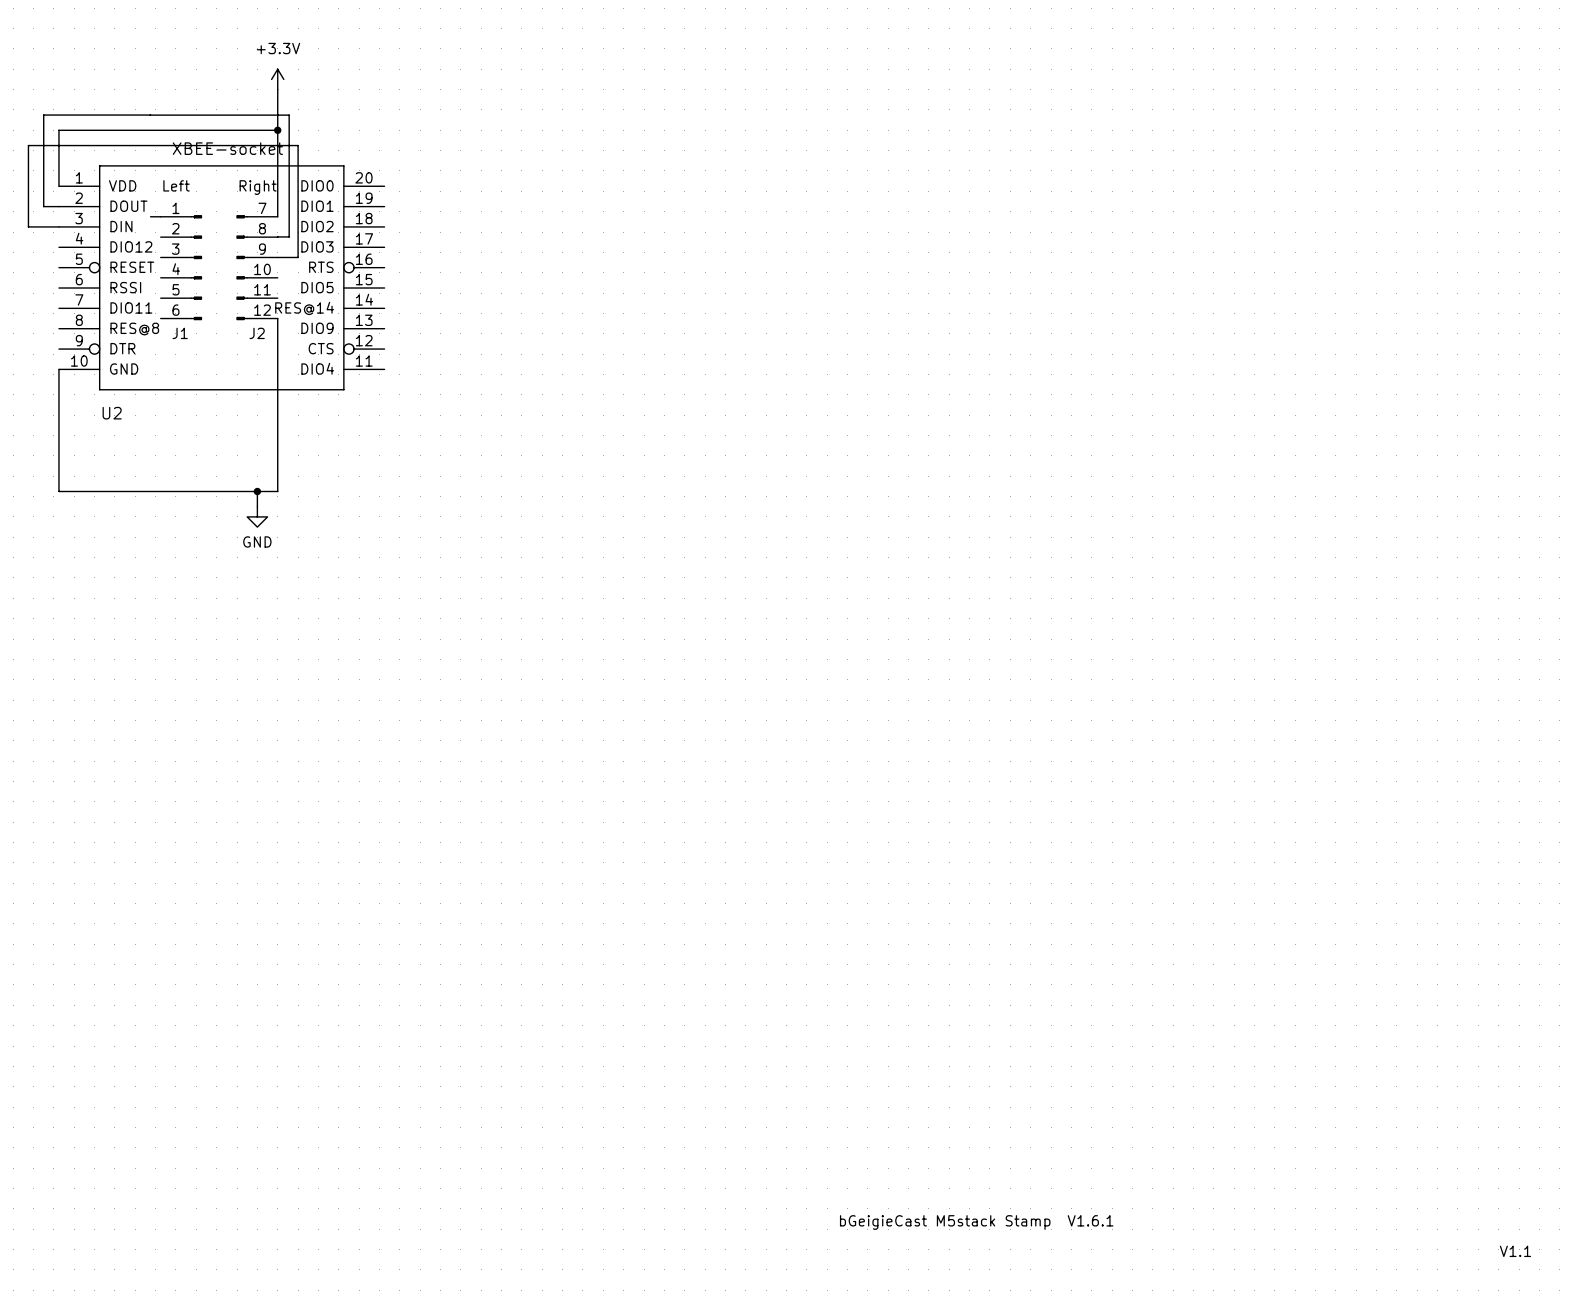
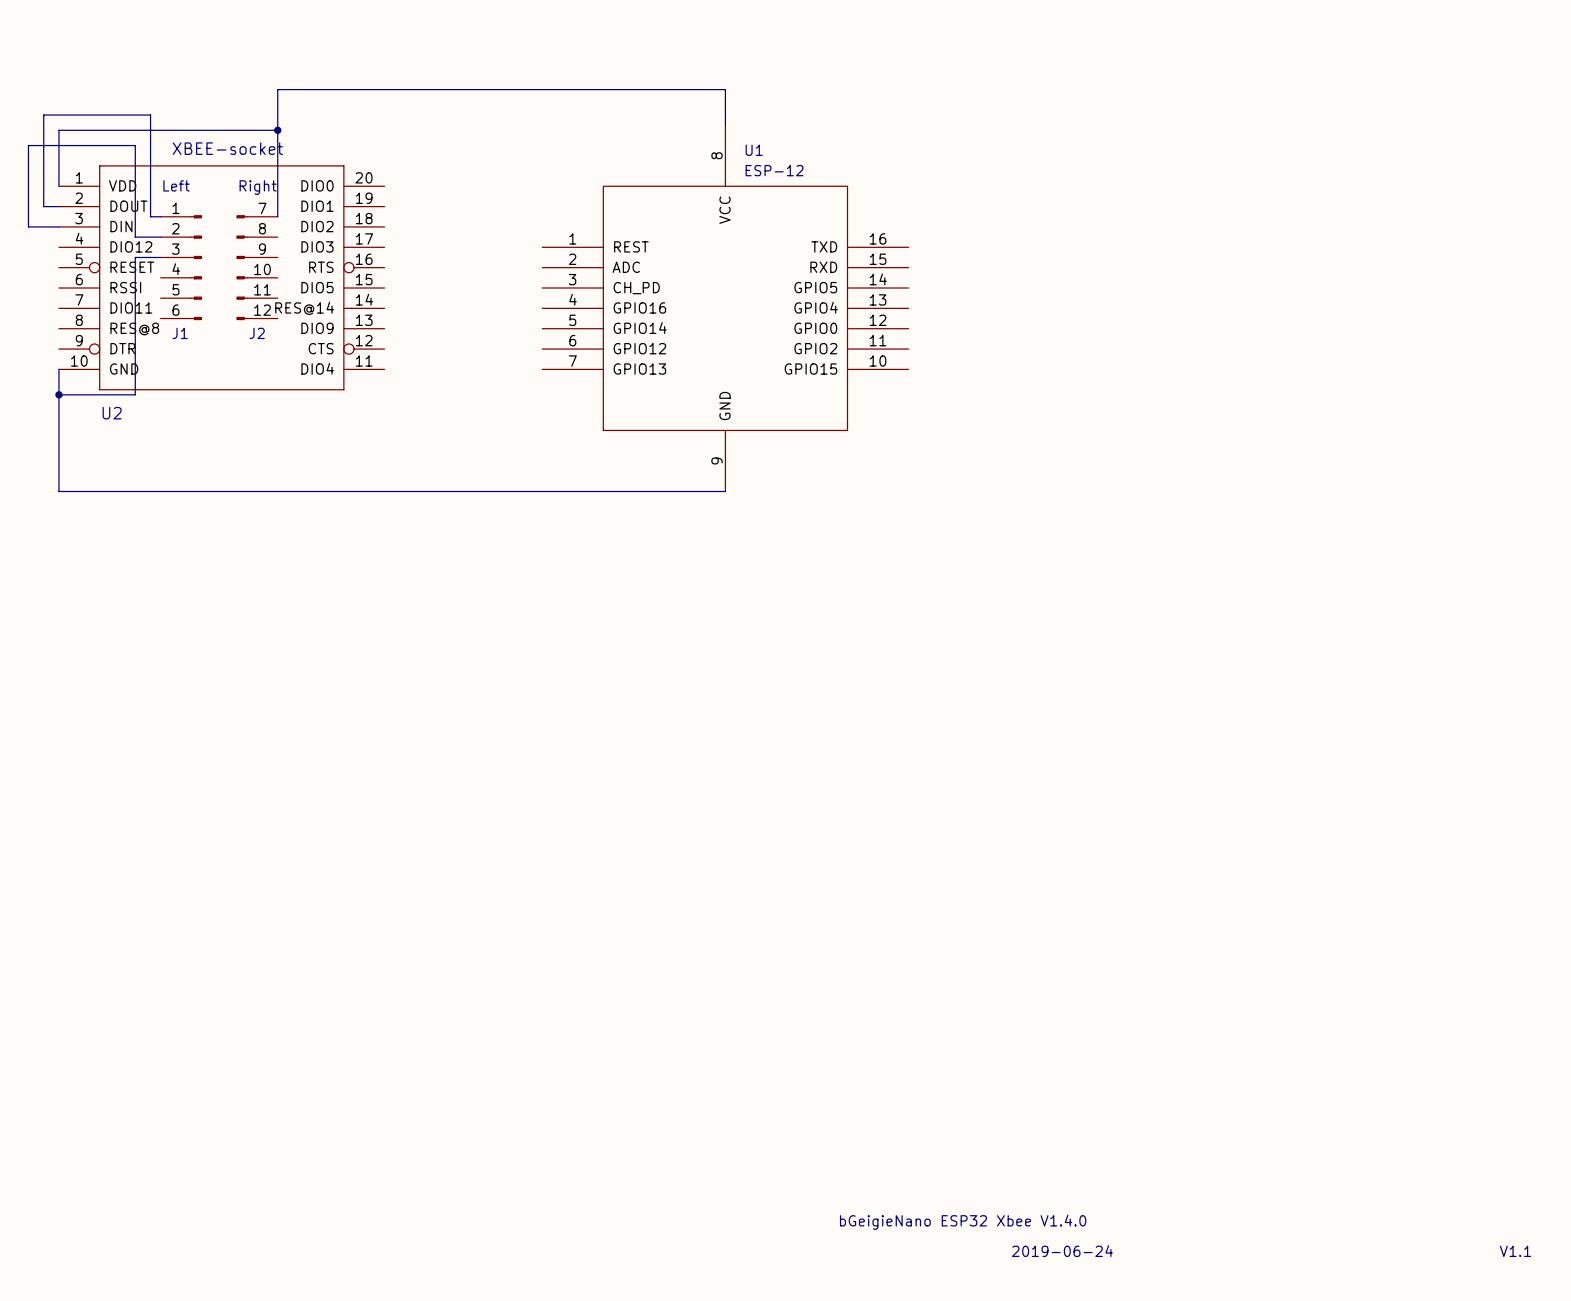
power symbol: +3.3V (277, 79) -> none
wire: none -> (277, 89) (725, 89) (725, 125)
wire: (150, 115) (289, 115) (289, 236) (277, 237) -> (150, 115) (150, 216)
wire: (135, 145) (298, 145) (298, 257) (277, 257) -> (135, 145) (135, 237) (160, 237)
wire: none -> (160, 257) (135, 257) (135, 394) (58, 394)
U1: none -> ESP-12 (725, 308)
wire: (277, 318) (277, 491) -> (725, 491) (277, 491)
junction: none -> (58, 394)
wire: (257, 491) (257, 506) -> none
junction: (257, 491) -> none
power symbol: GND (257, 516) -> none
text: bGeigieCast M5stack Stamp V1.6.1 (976, 1222) -> bGeigieNano ESP32 Xbee V1.4.0 (963, 1222)
text: none -> 2019-06-24 (1062, 1251)

